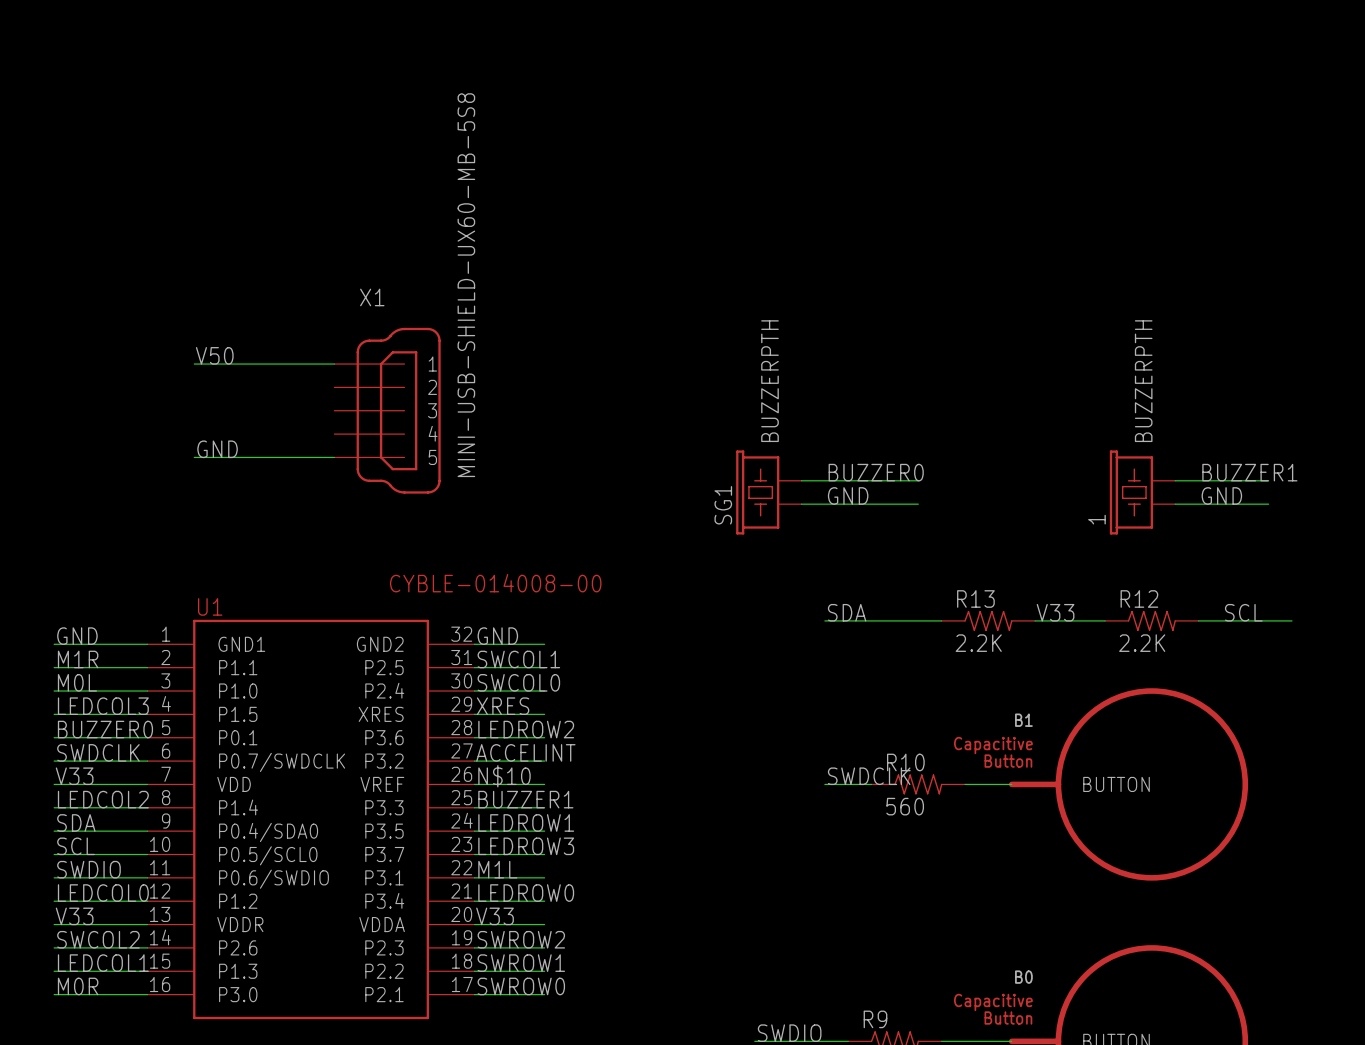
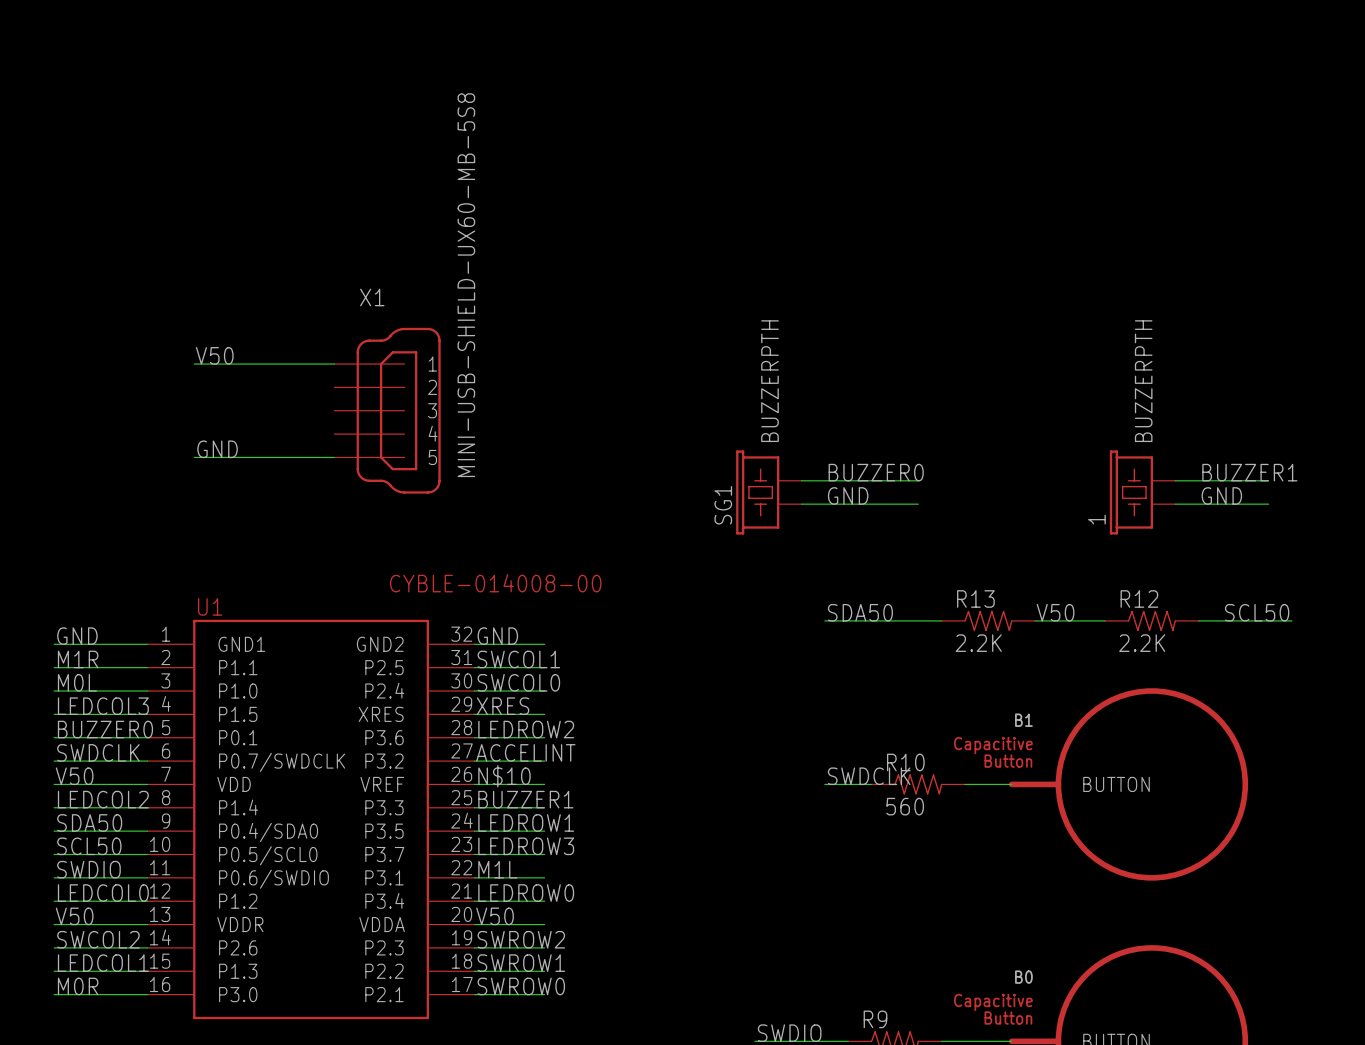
label: SDA (847, 612) -> SDA50 (860, 612)
label: V33 (1055, 612) -> V50 (1055, 612)
label: SCL (1243, 612) -> SCL50 (1257, 612)
label: V33 (74, 776) -> V50 (74, 776)
label: SDA (76, 822) -> SDA50 (89, 822)
label: SCL (76, 846) -> SCL50 (89, 846)
label: V33 (74, 916) -> V50 (74, 916)
label: V33 (495, 916) -> V50 (495, 916)

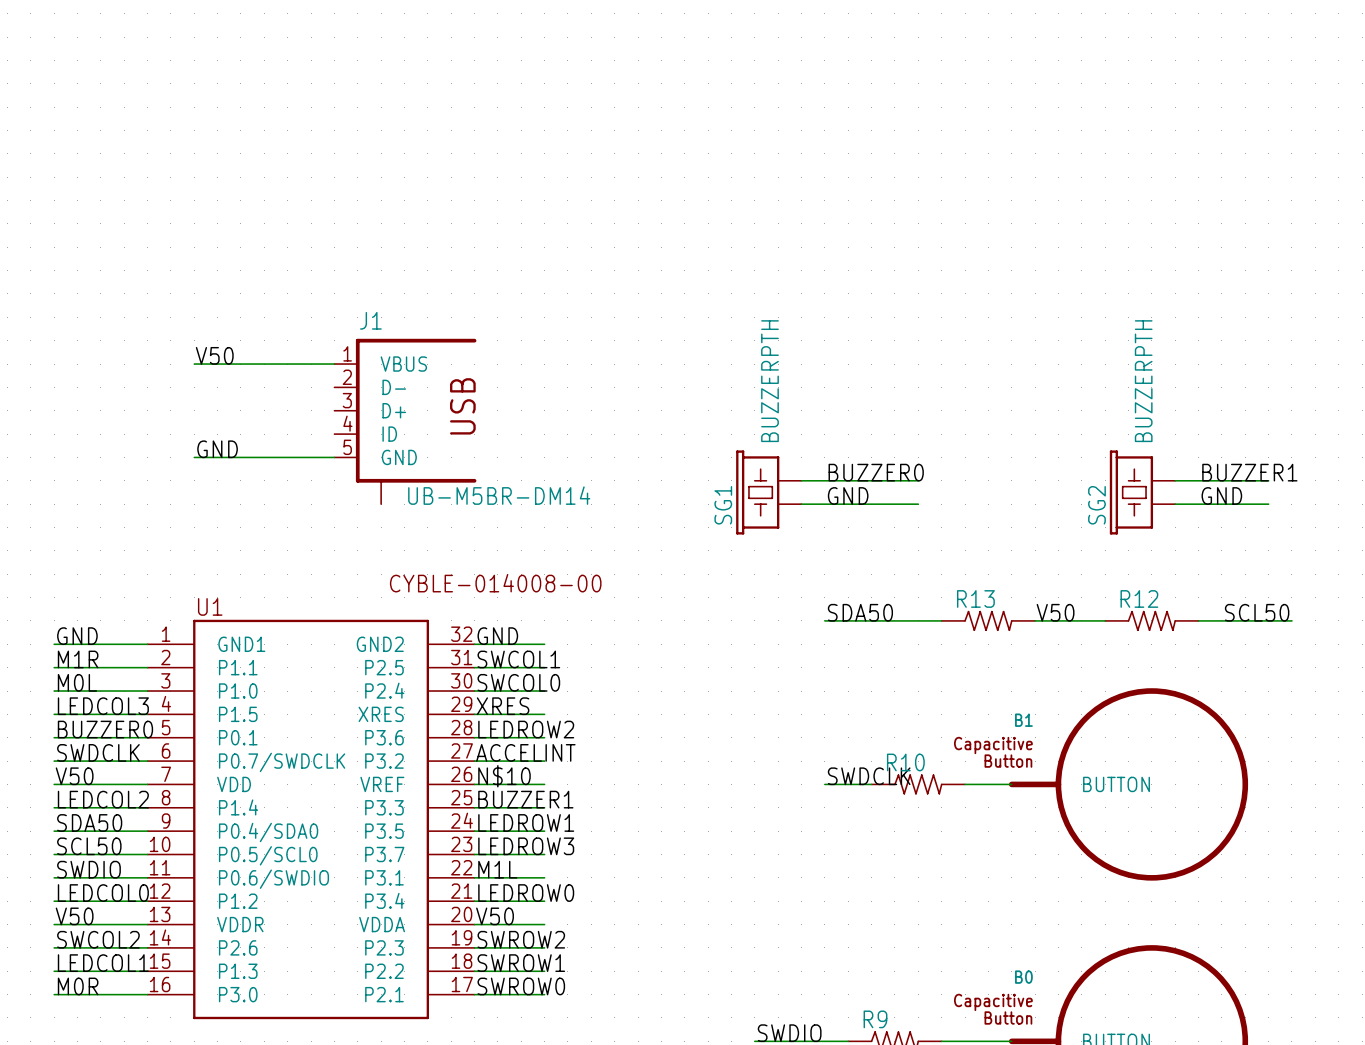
X1: MINI-USB-SHIELD-UX60-MB-5S8 (387, 410) -> none
J1: none -> UB-M5BR-DM14 (405, 421)
1 name: 1 (1096, 519) -> SG2 (1096, 505)
R13 value: 2.2K (978, 643) -> none
R12 value: 2.2K (1142, 643) -> none
R10 value: 560 (905, 806) -> none

